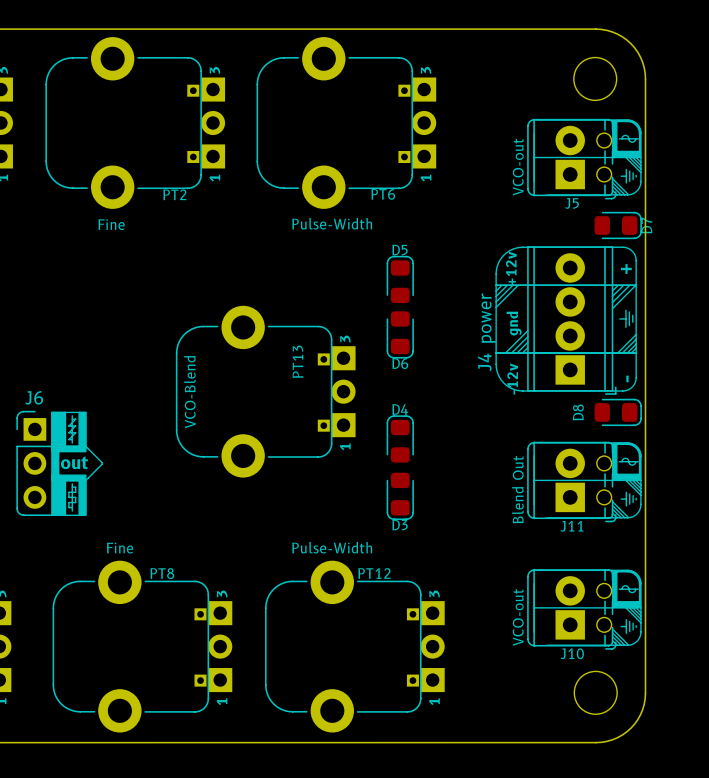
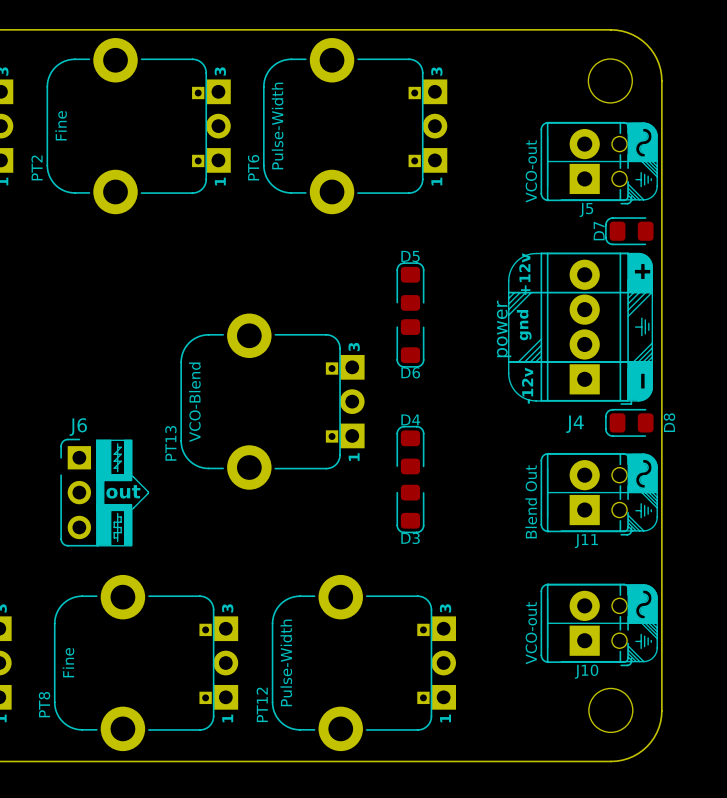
J5 footprint: [527, 118, 642, 200] -> [540, 121, 658, 205]
PT2 name rotation: 0° (174, 194) -> 90° counterclockwise (37, 167)
PT2 name position: PT2 (174, 194) -> PT2 (37, 167)
PT6 name rotation: 0° (383, 194) -> 90° counterclockwise (253, 167)
PT6 name position: PT6 (383, 194) -> PT6 (253, 167)
PT6 text rotation: 0° (332, 223) -> 90° counterclockwise (277, 126)
PT2 text rotation: 0° (111, 224) -> 90° counterclockwise (61, 125)
PT2 text position: Fine (111, 224) -> Fine (61, 125)
D7 rotation: 0° (618, 225) -> 180° (629, 231)
J4 footprint: [495, 246, 637, 395] -> [508, 252, 654, 405]
PT13 name position: PT13 (297, 361) -> PT13 (170, 443)
J4 name position: J4 (484, 362) -> J4 (574, 424)
J6 footprint: [16, 410, 104, 517] -> [60, 438, 150, 547]
D8 rotation: 0° (618, 412) -> 180° (629, 422)
J11 footprint: [527, 441, 642, 523] -> [540, 452, 658, 536]
PT12 text rotation: 0° (332, 547) -> 90° counterclockwise (286, 662)
PT8 text rotation: 0° (120, 548) -> 90° counterclockwise (68, 662)
PT8 text position: Fine (120, 548) -> Fine (68, 662)
J10 footprint: [527, 569, 642, 650] -> [540, 583, 658, 667]
PT8 name rotation: 0° (162, 573) -> 90° counterclockwise (44, 704)
PT8 name position: PT8 (162, 573) -> PT8 (44, 704)
PT12 name rotation: 0° (374, 573) -> 90° counterclockwise (262, 704)
PT12 name position: PT12 (374, 573) -> PT12 (262, 704)

